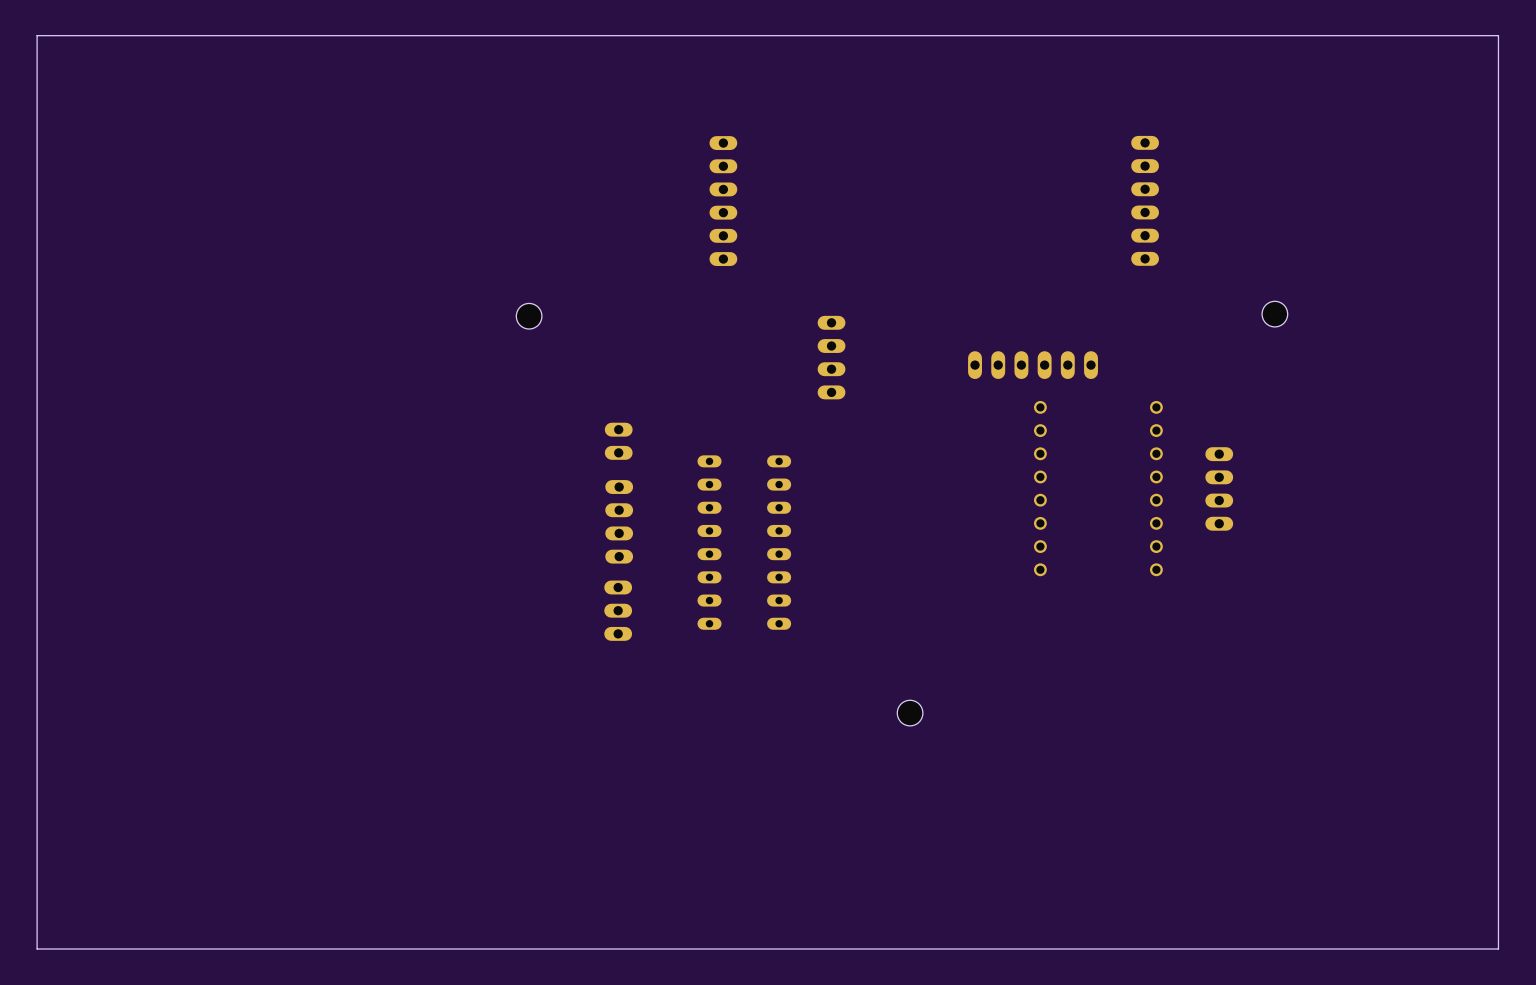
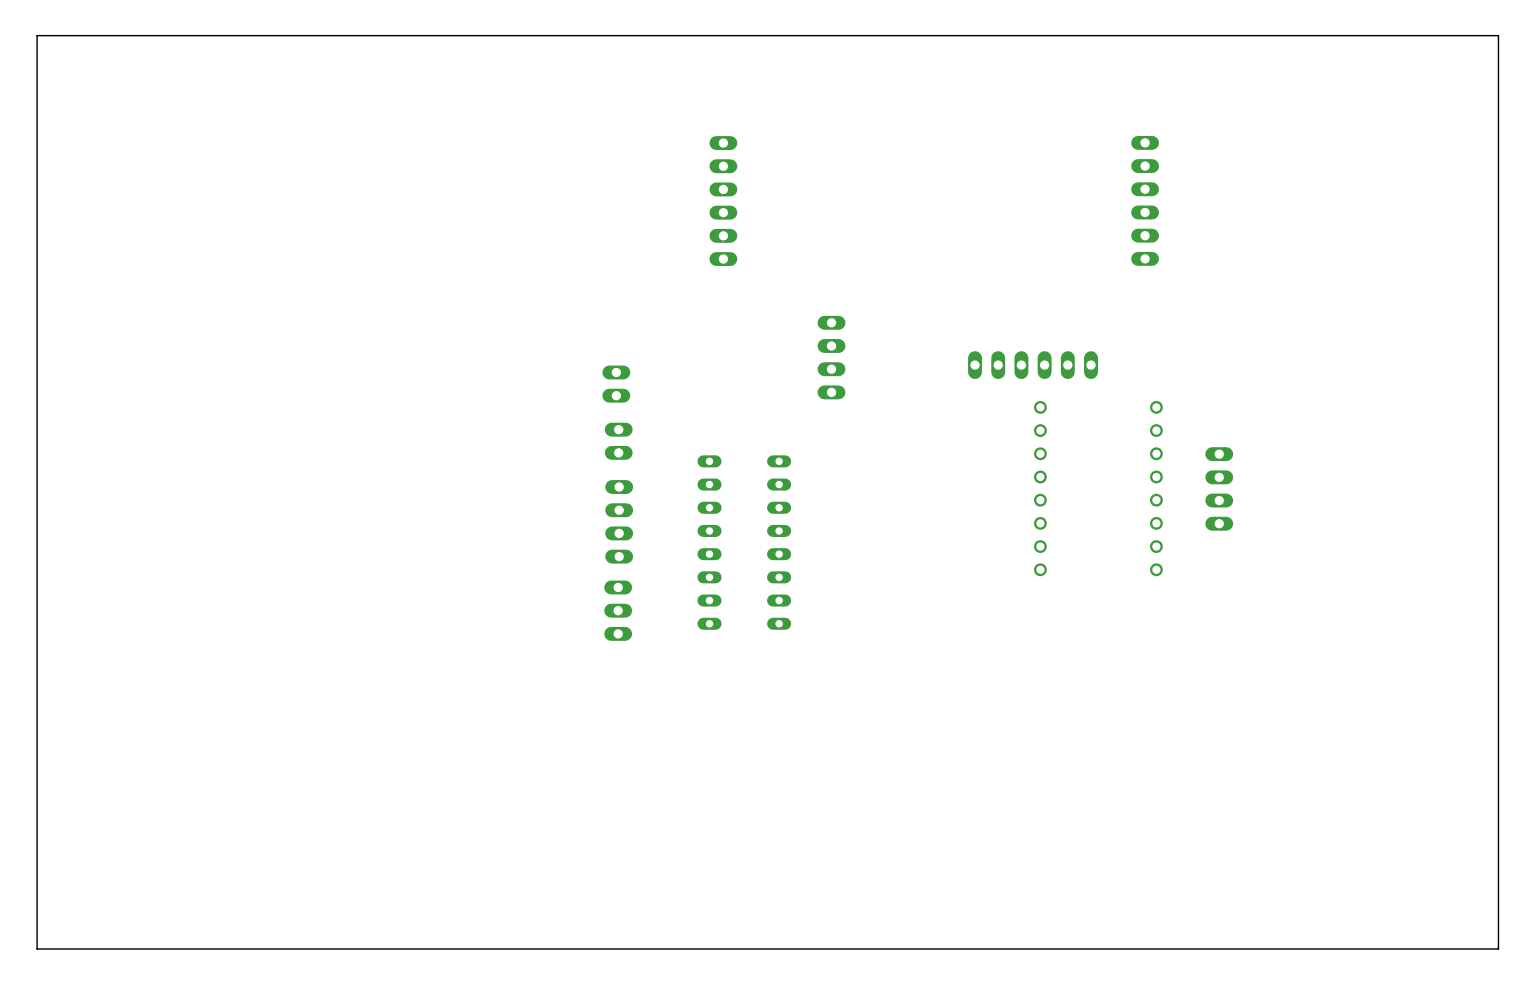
part: (1274, 314) -> none
part: (529, 316) -> none
part: none -> (616, 384)
part: (910, 713) -> none

